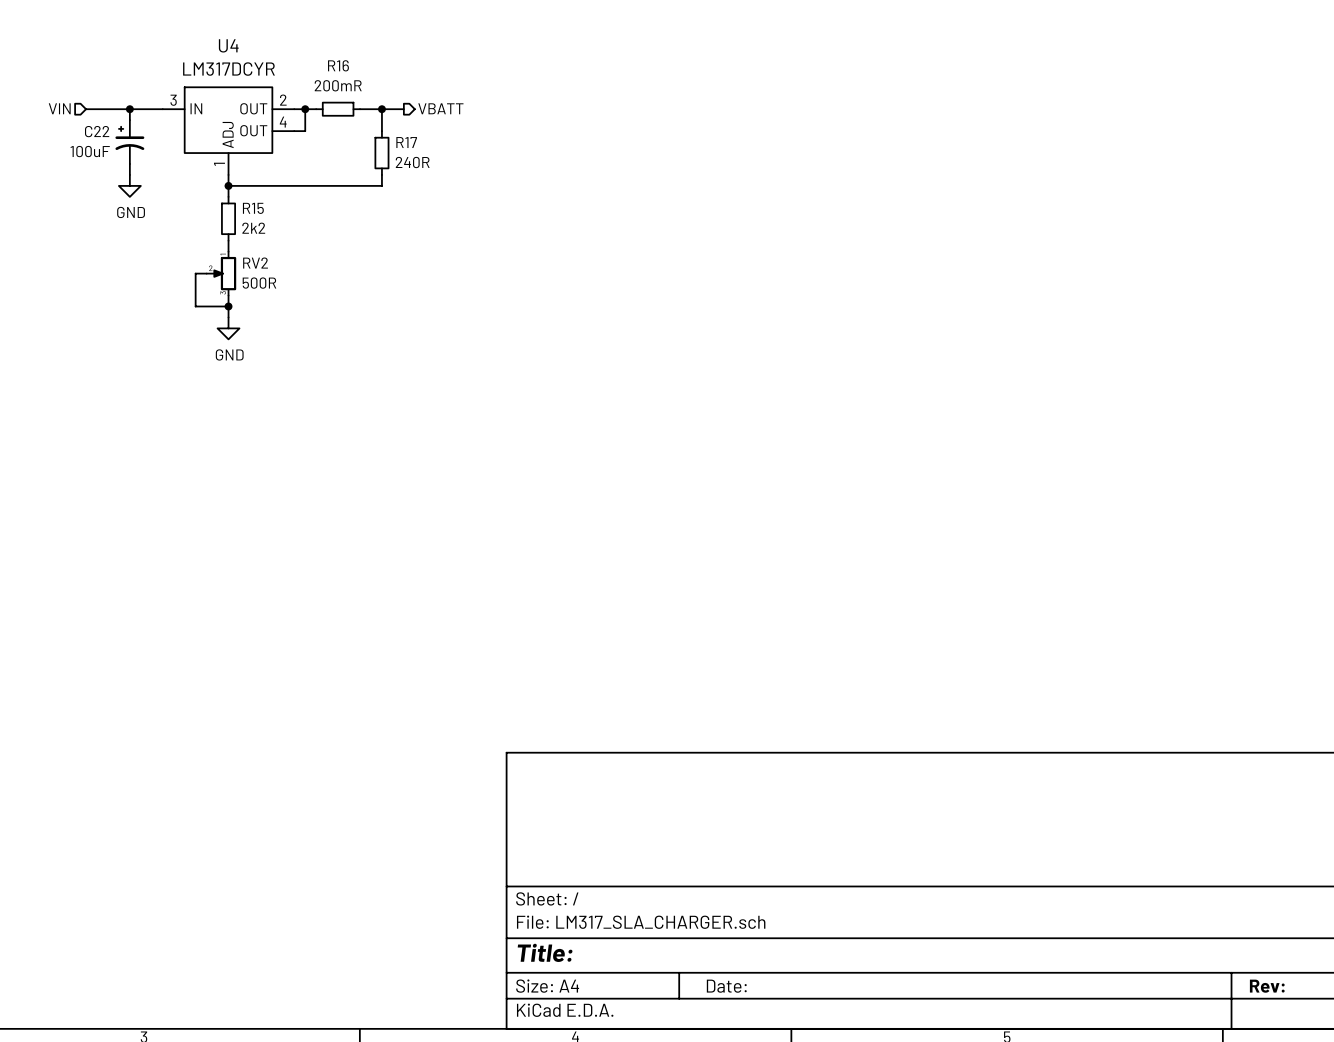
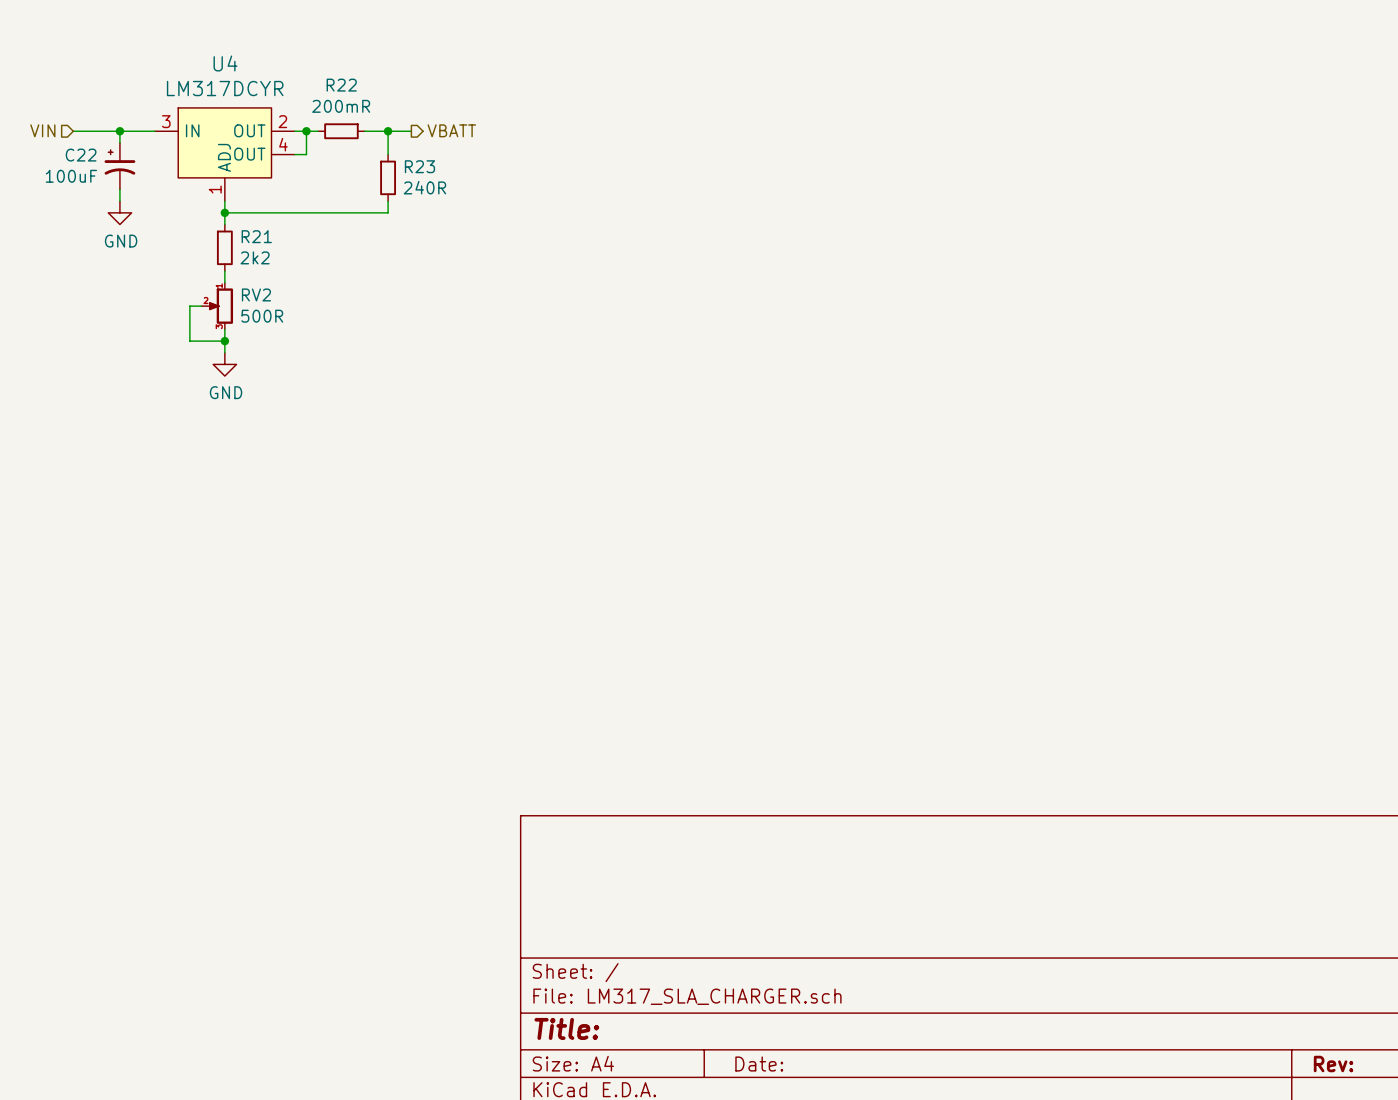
R16 name: R16 (338, 65) -> R22 (341, 85)
R17 name: R17 (406, 142) -> R23 (419, 166)
R15 name: R15 (253, 208) -> R21 (256, 236)

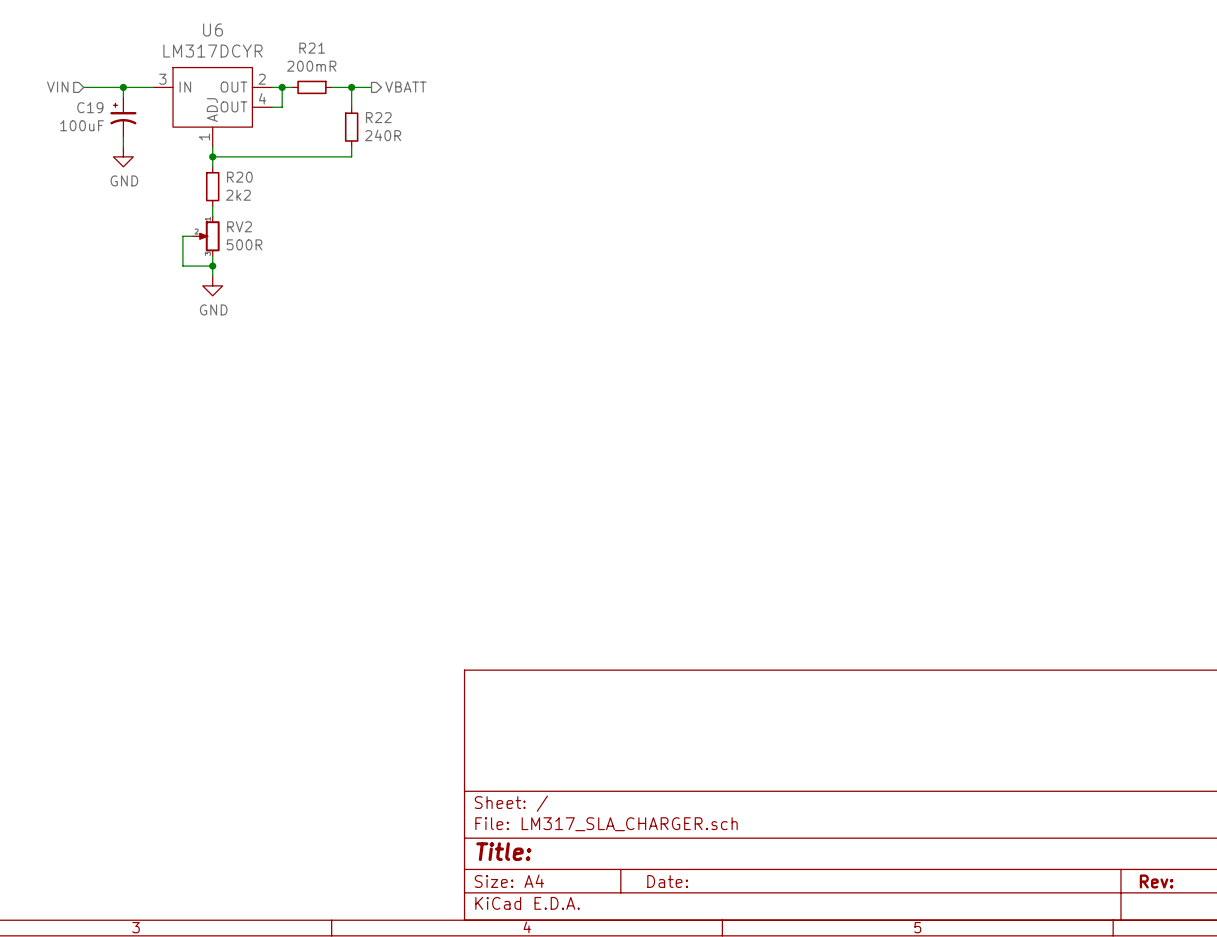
U4 name: U4 (225, 63) -> U6 (212, 29)
R22 name: R22 (341, 85) -> R21 (312, 48)
C22 name: C22 (81, 155) -> C19 (90, 107)
R23 name: R23 (419, 166) -> R22 (378, 117)
R21 name: R21 (256, 236) -> R20 (239, 177)

